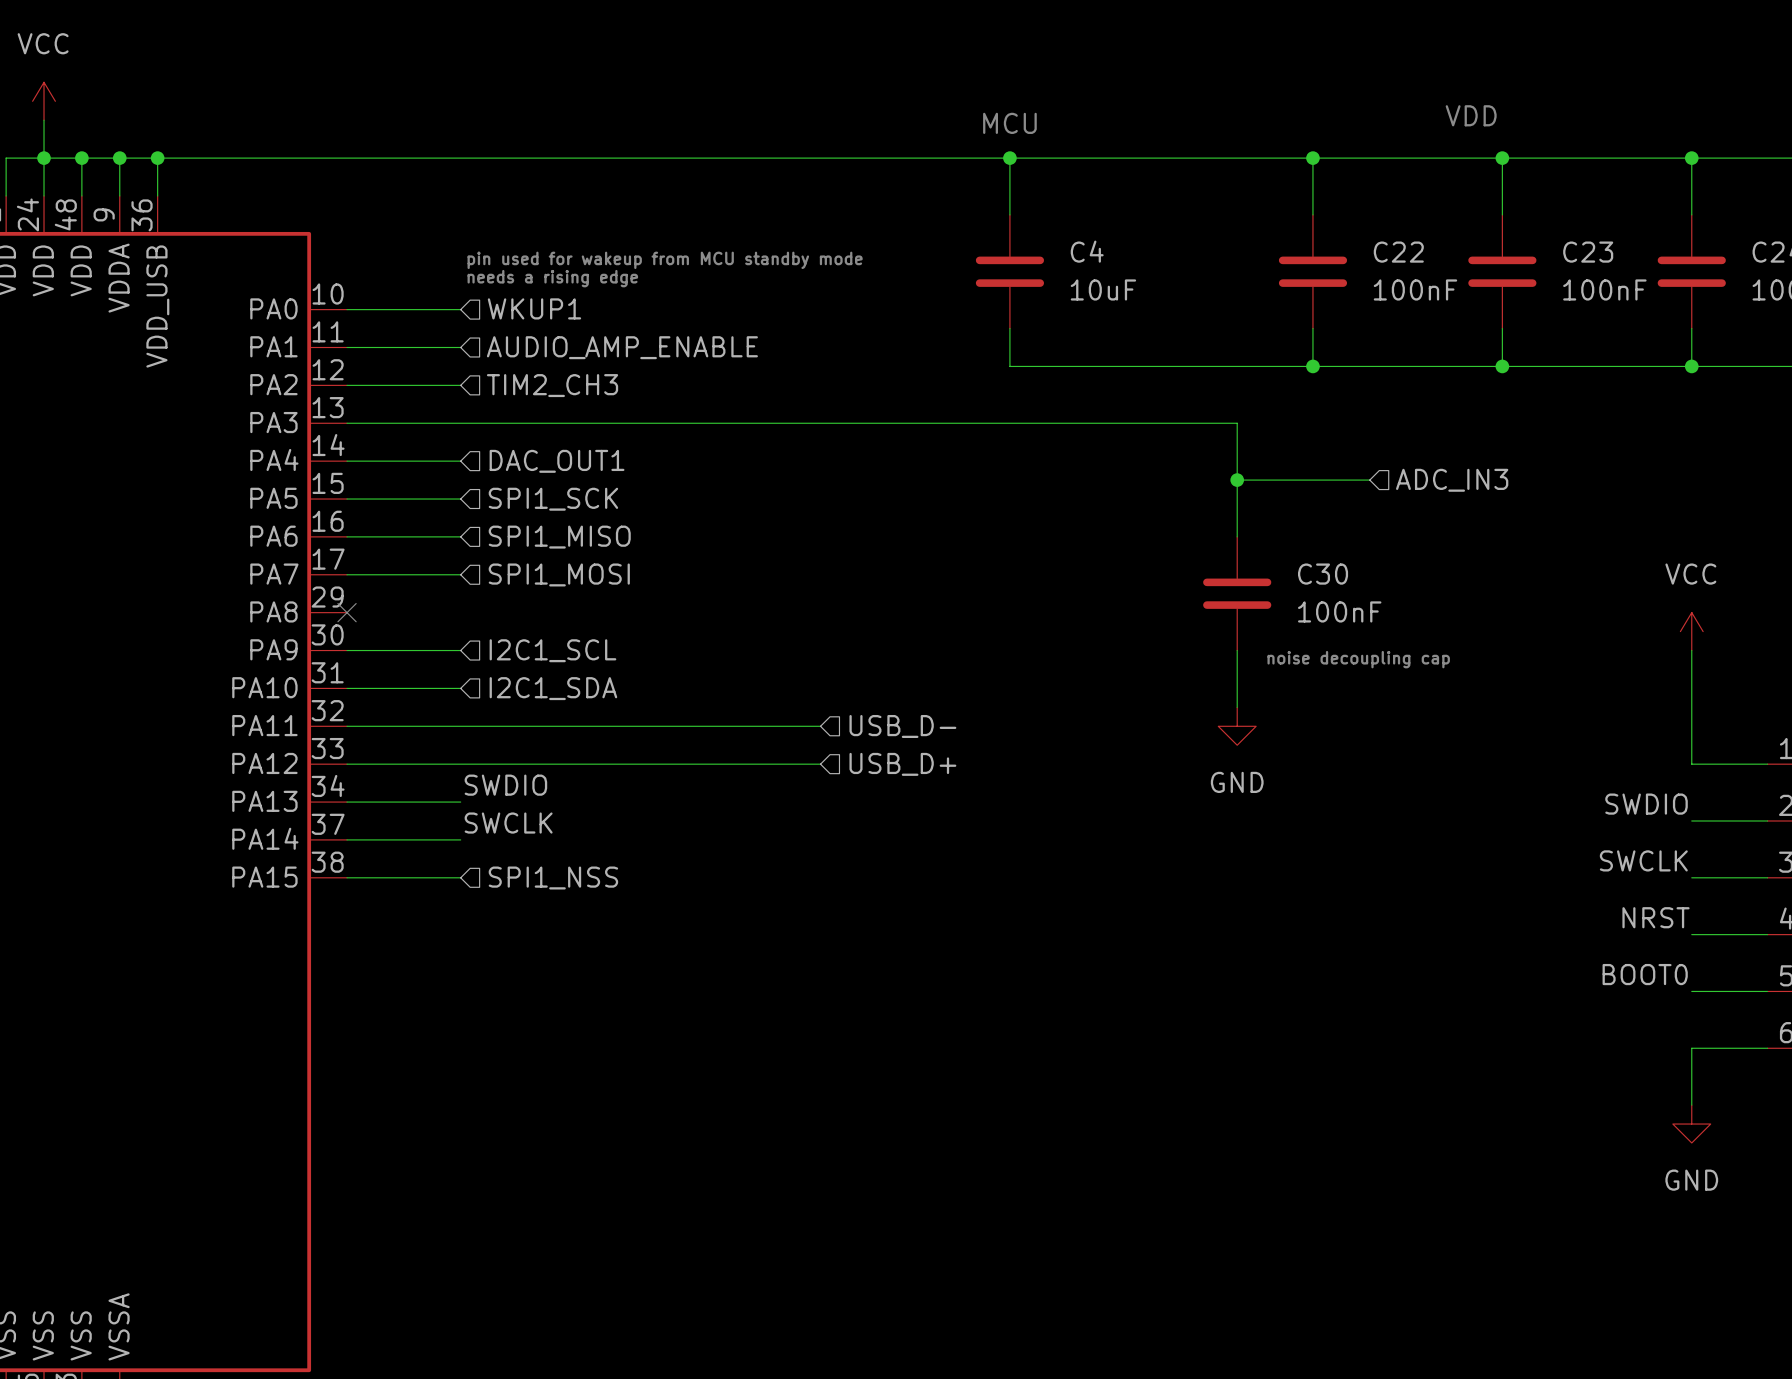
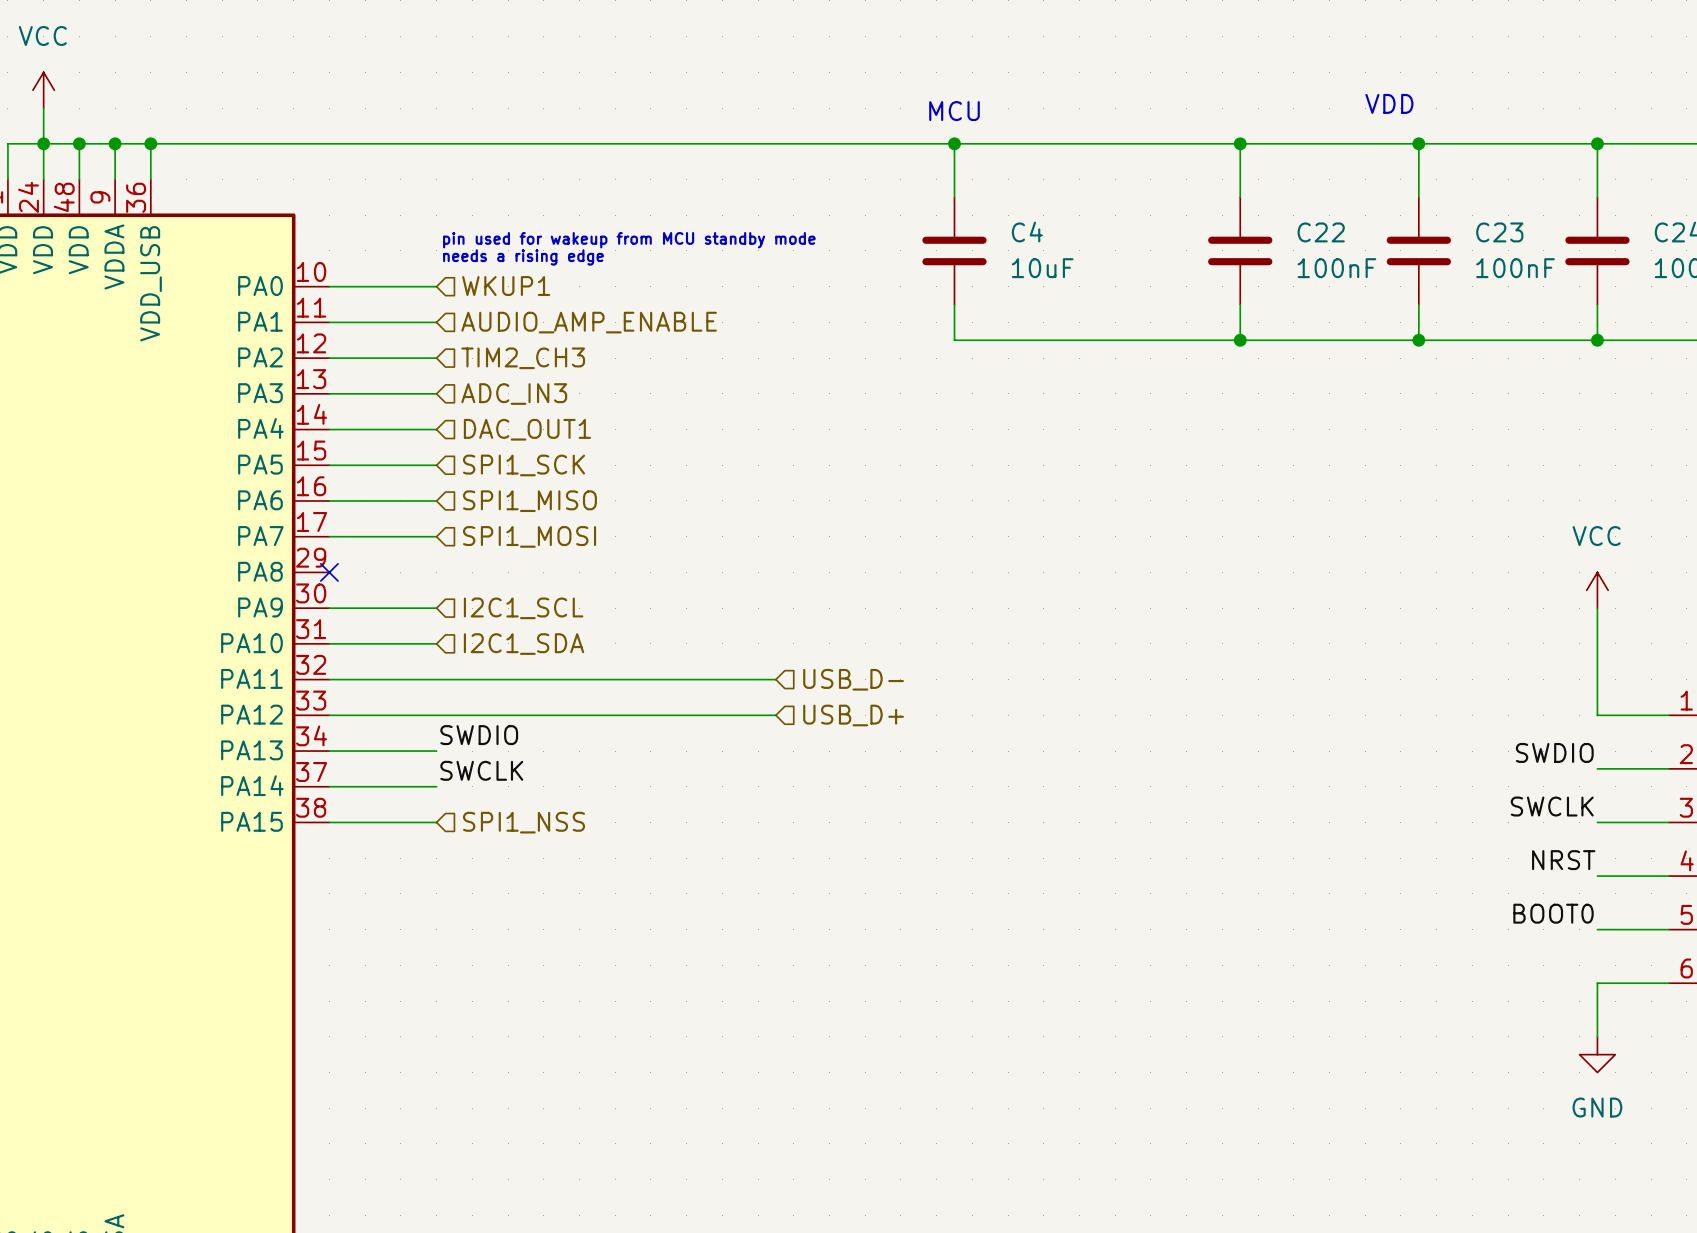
wire: (460, 423) (1237, 423) (1237, 536) -> none
hierarchical label: none -> ADC_IN3 (514, 394)
wire: (1237, 480) (1369, 480) -> none
junction: (1237, 480) -> none
hierarchical label: ADC_IN3 (1452, 480) -> none
C30: 100nF (1237, 593) -> none
wire: (1237, 650) (1237, 707) -> none
text: noise decoupling cap (1358, 659) -> none
power symbol: GND (1237, 726) -> none

